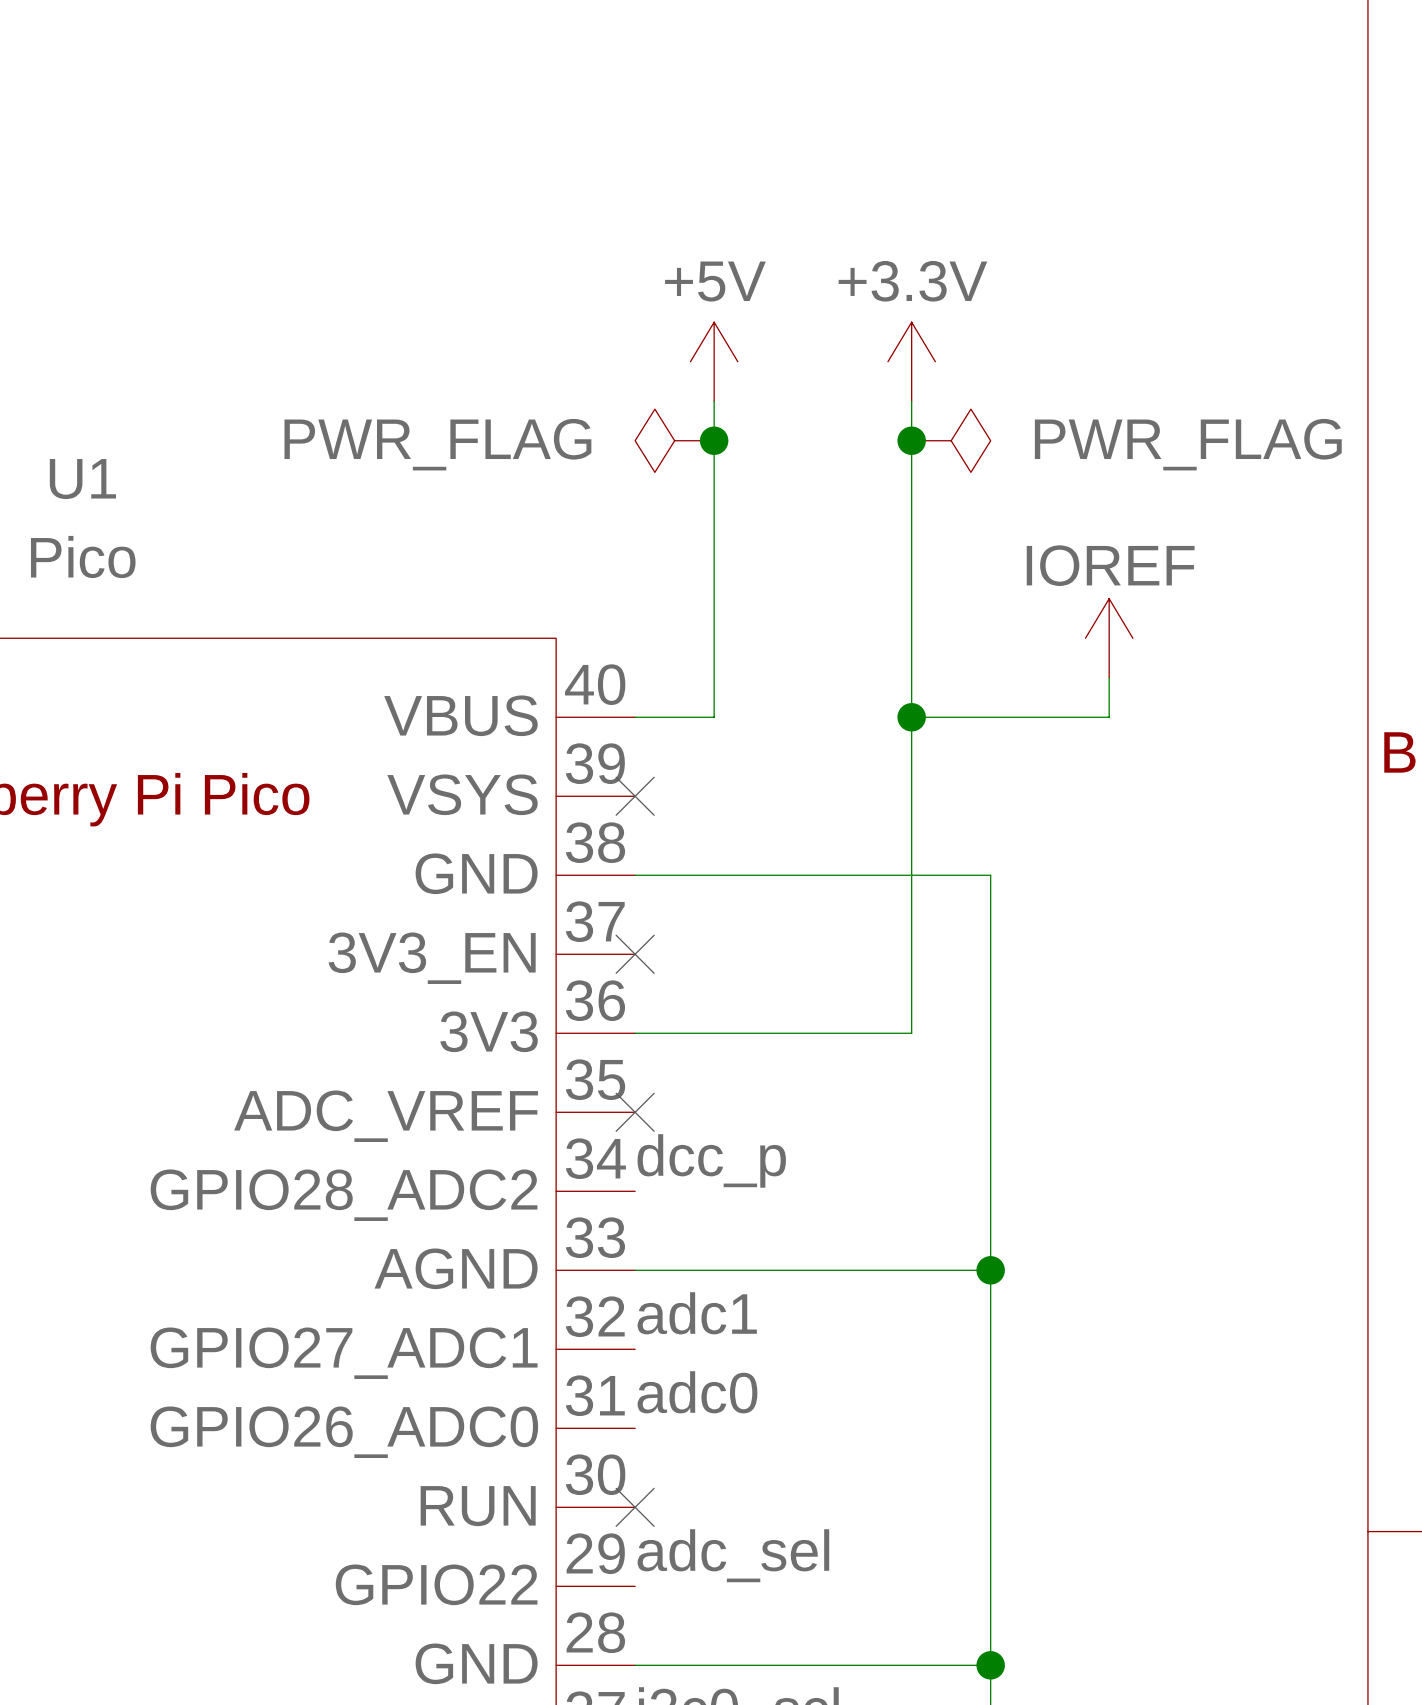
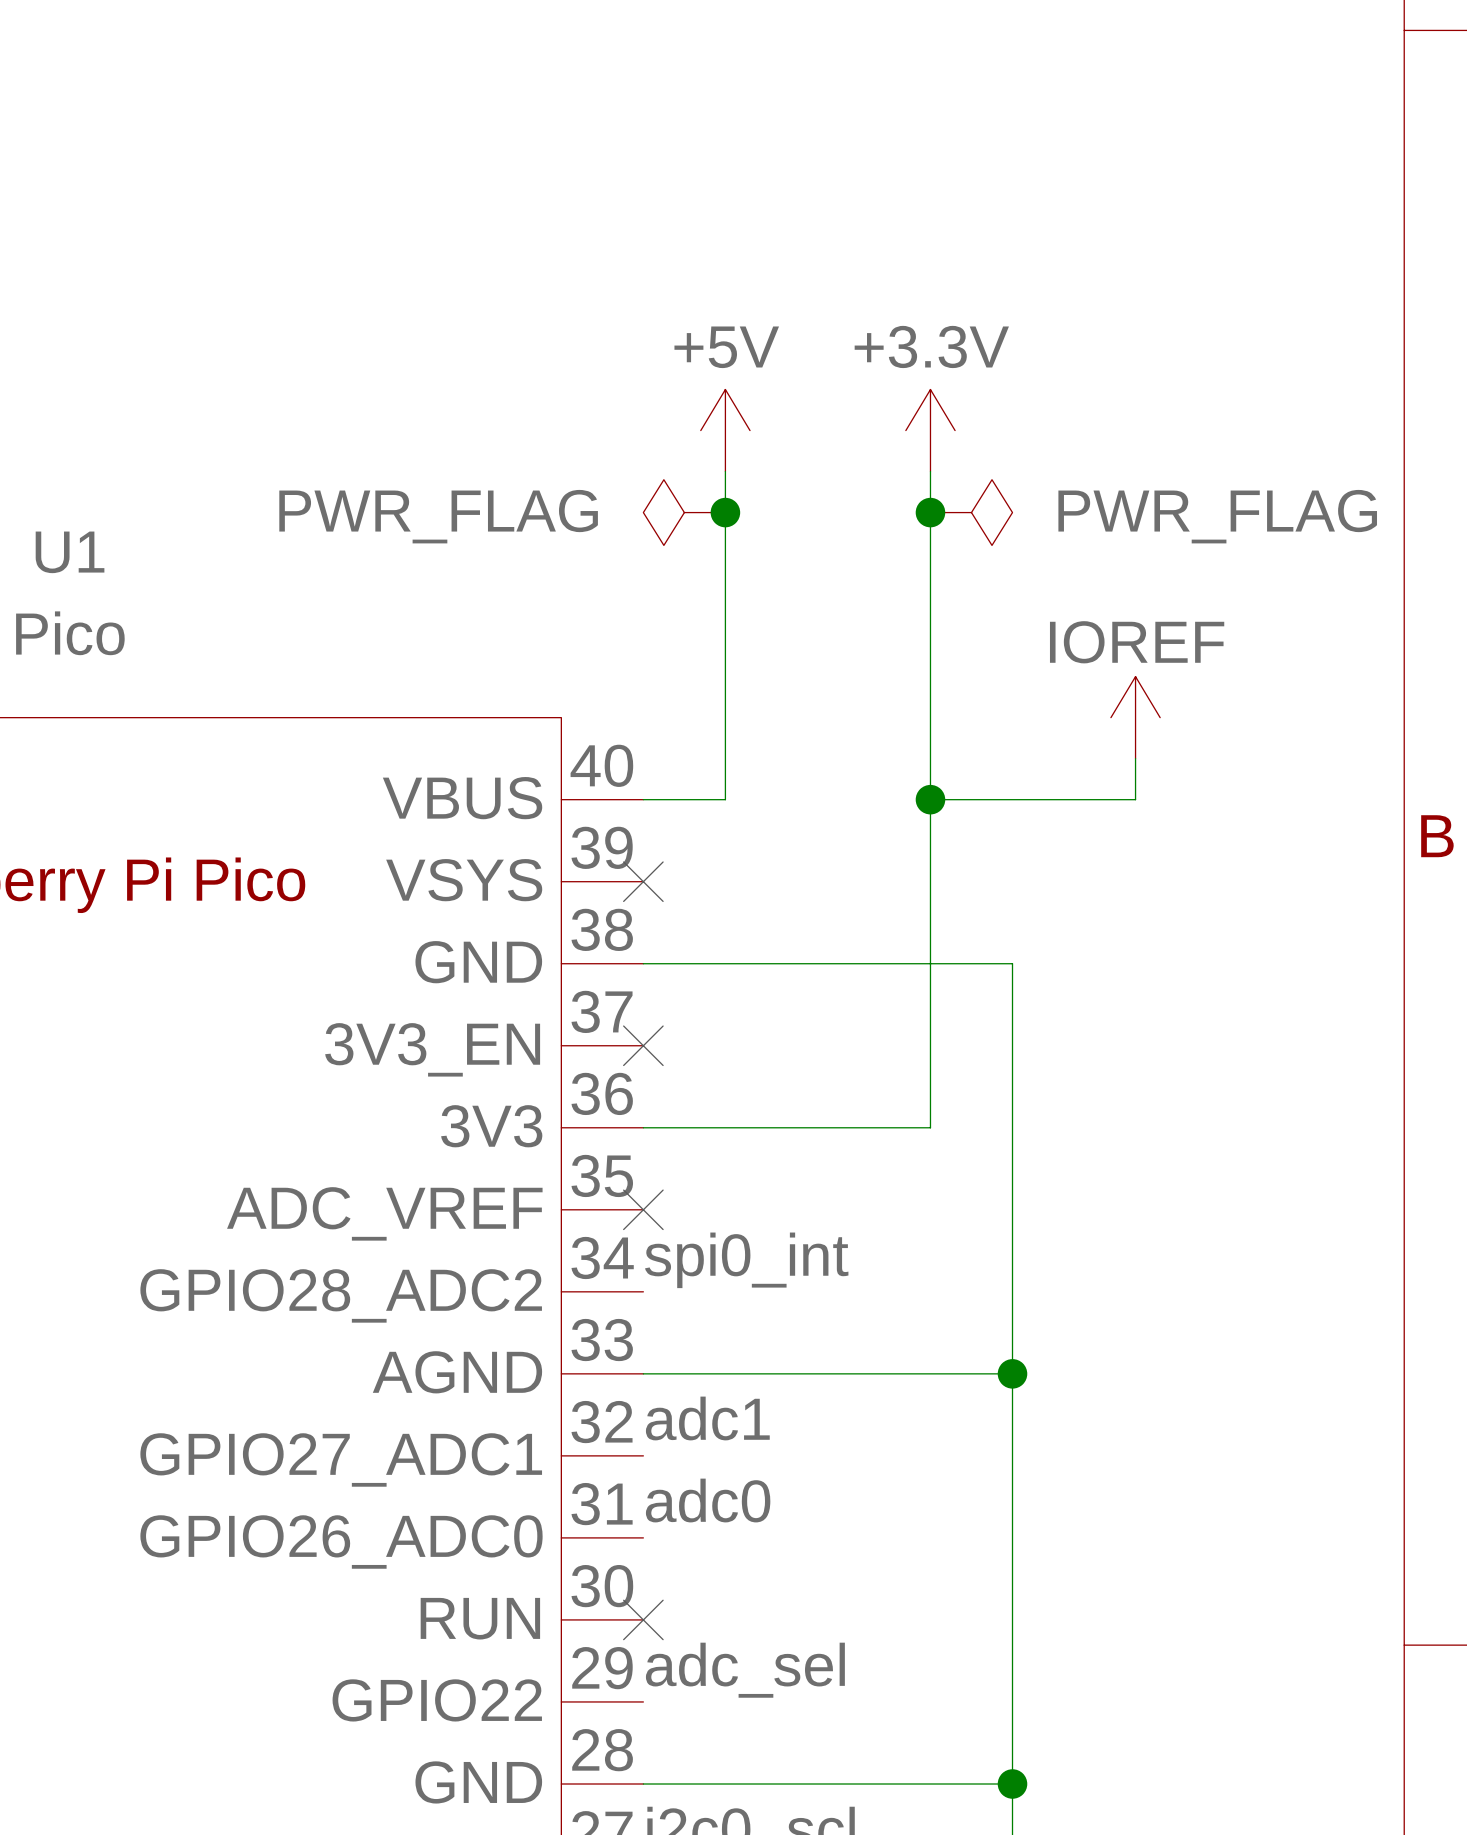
label: dcc_p (711, 1160) -> spi0_int (746, 1260)

